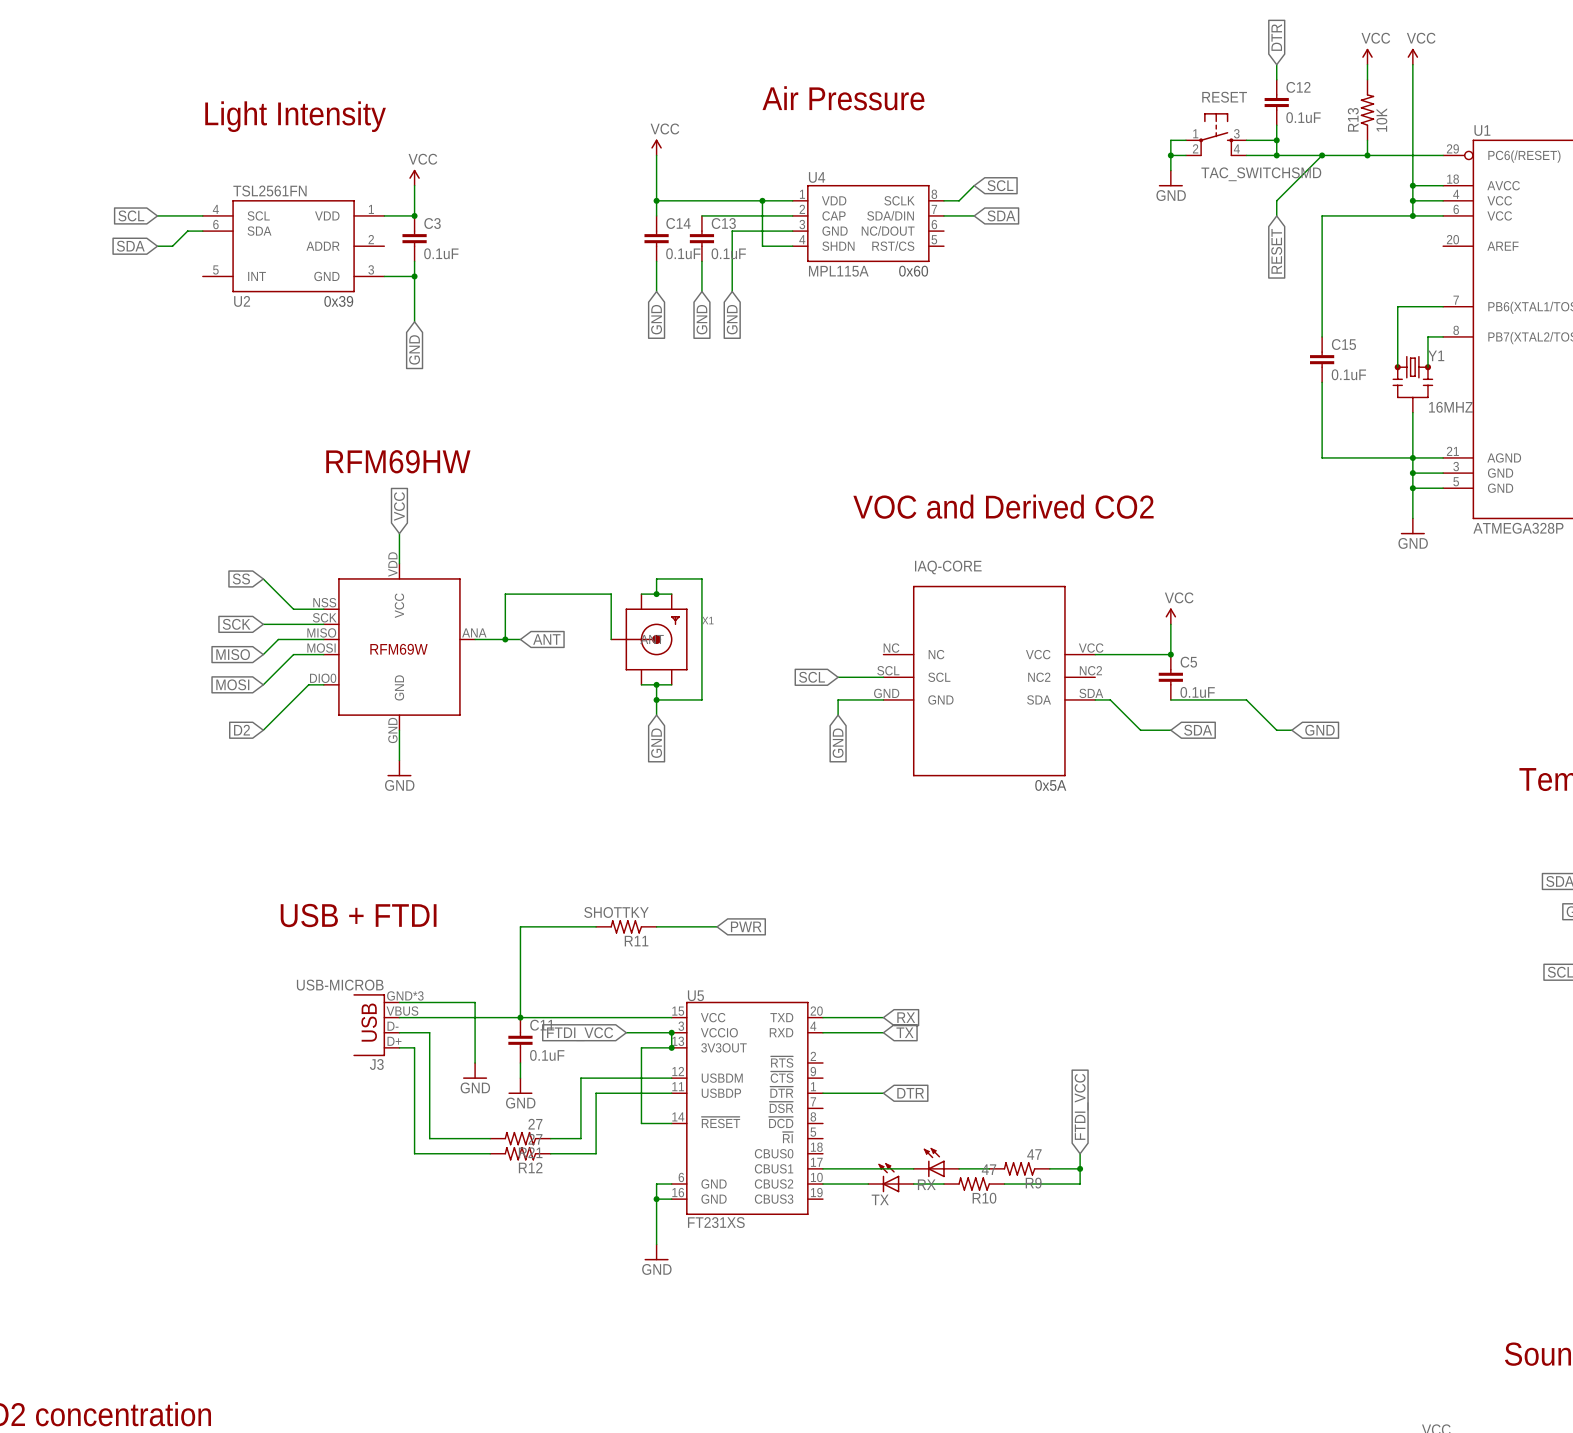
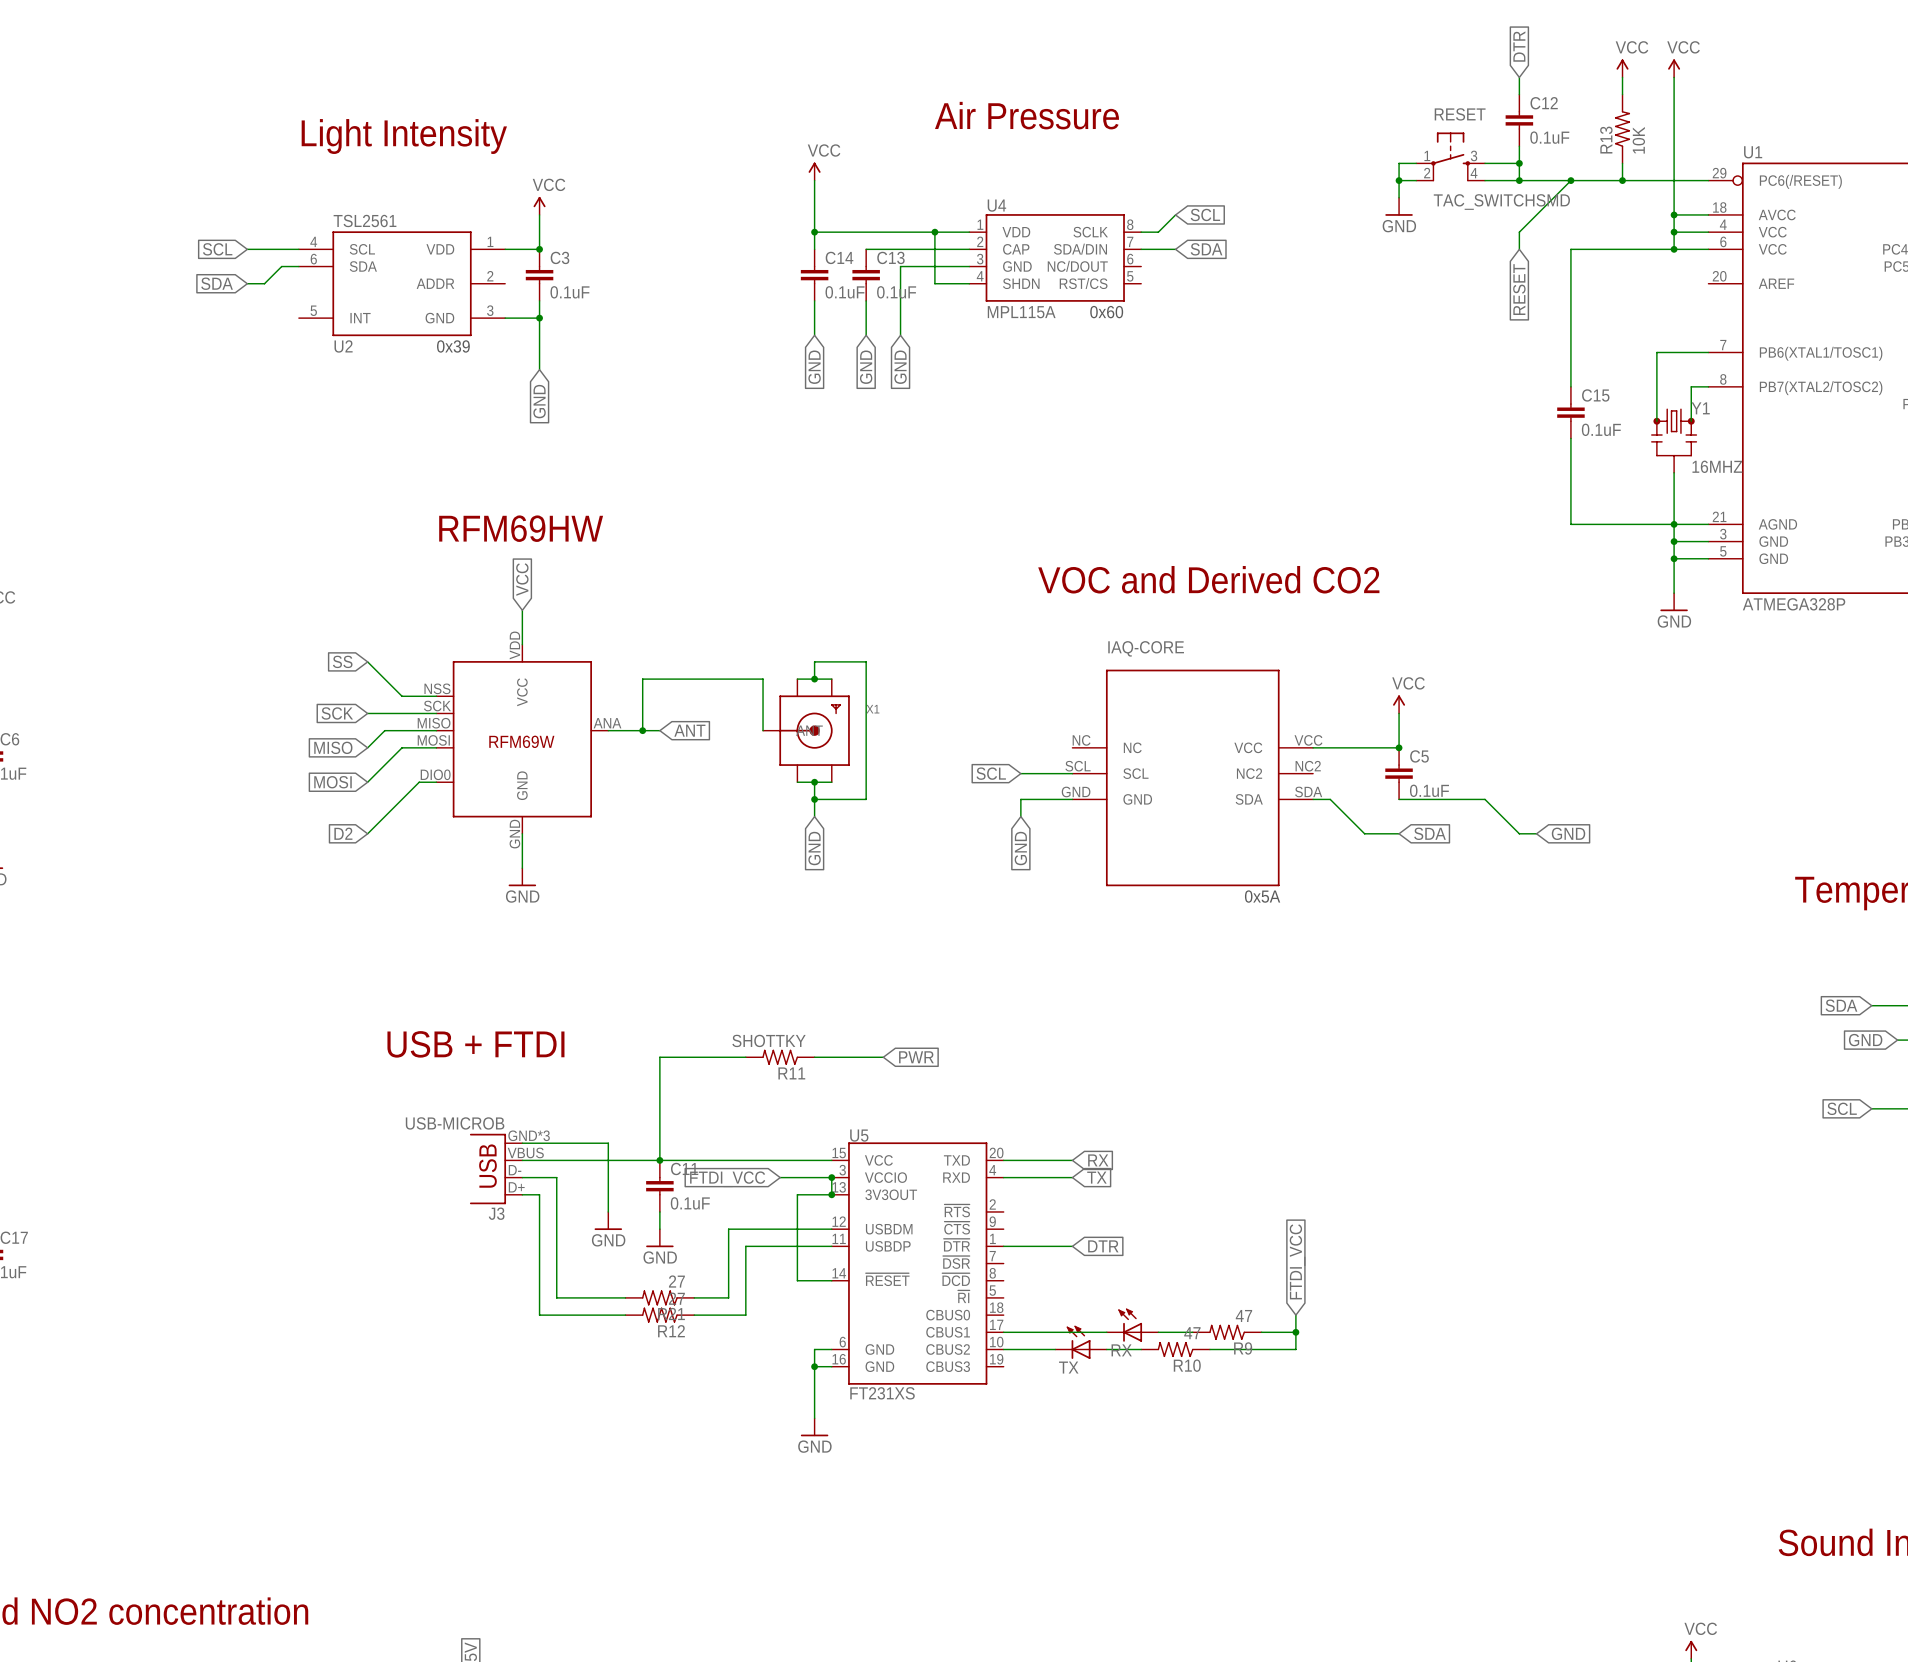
U2 value: TSL2561FN (269, 190) -> TSL2561 (365, 220)

